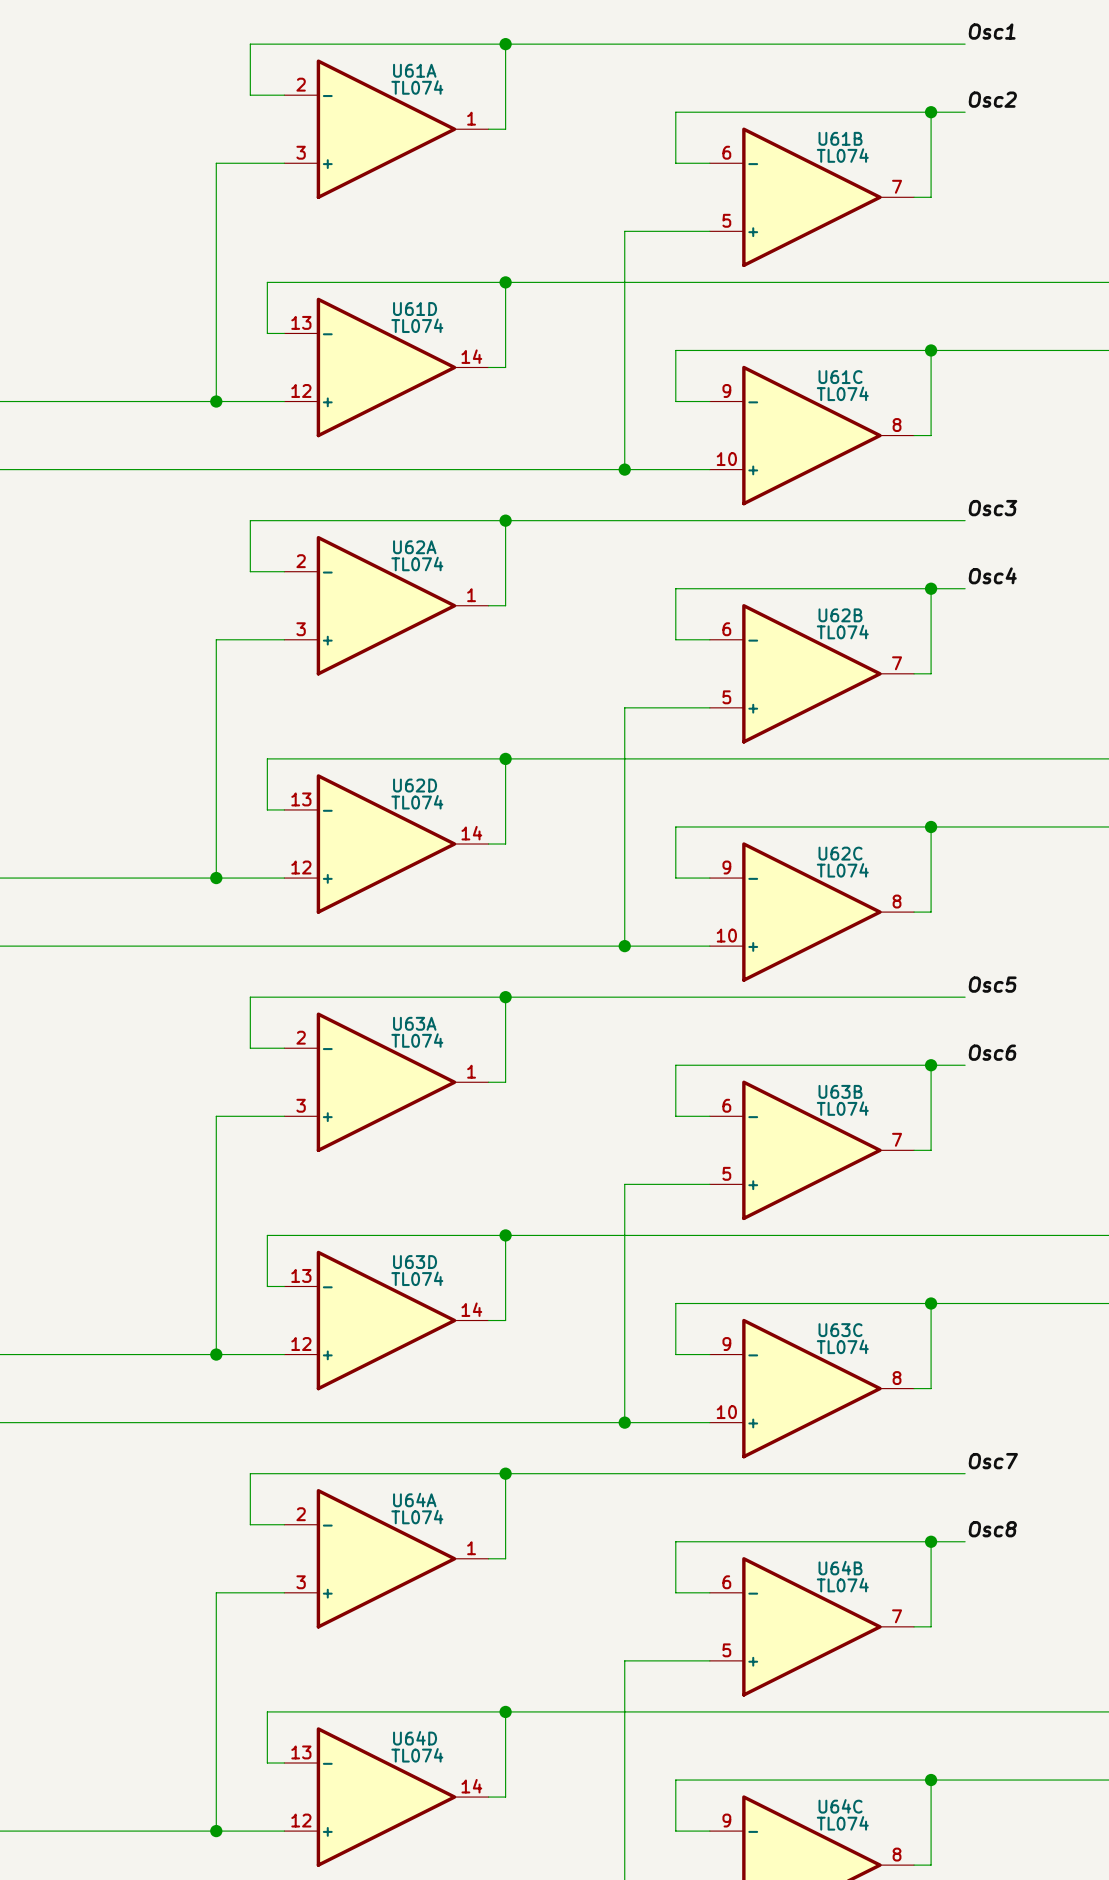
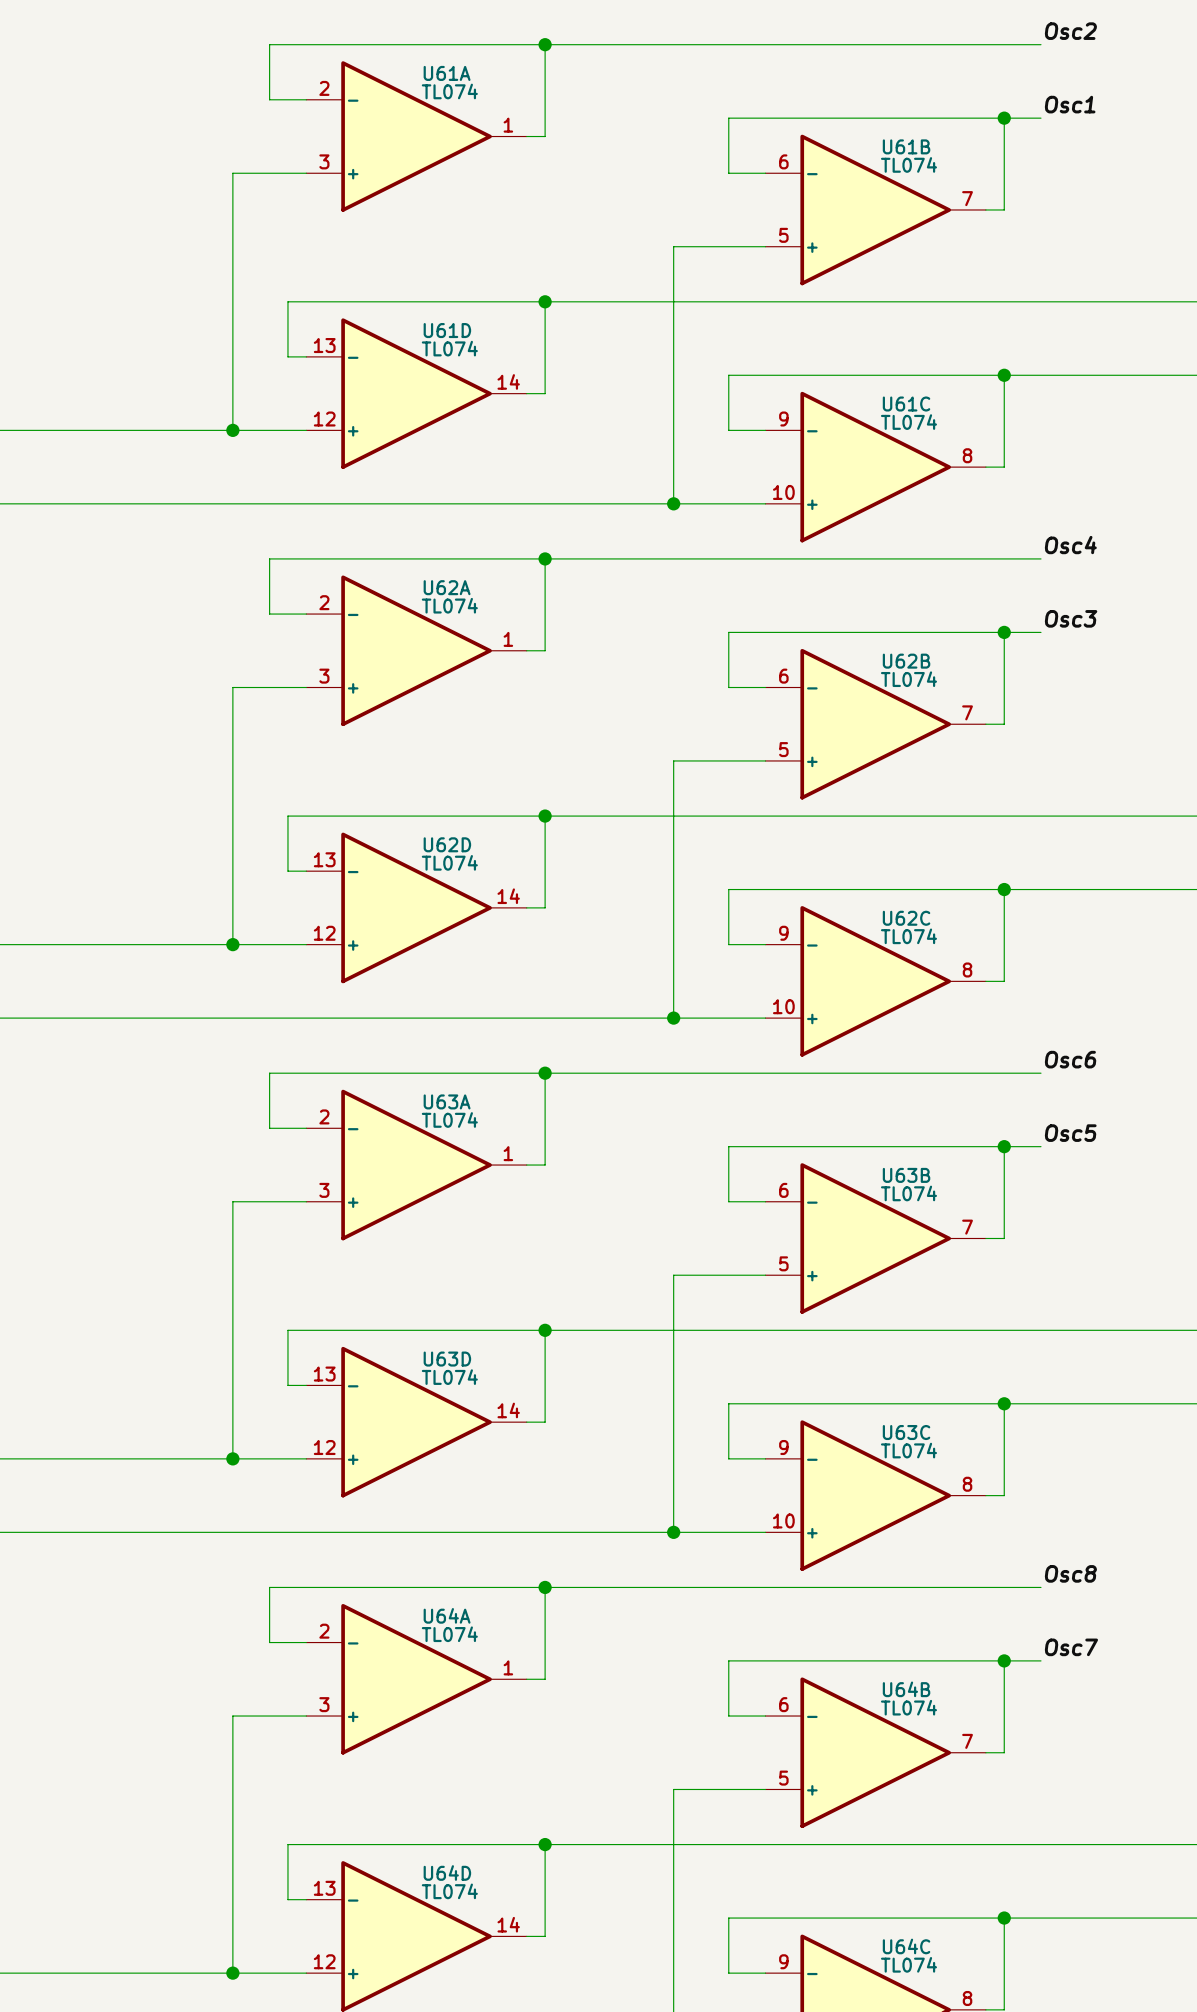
label: Osc1 (992, 31) -> Osc2 (1070, 31)
label: Osc2 (992, 99) -> Osc1 (1070, 104)
label: Osc3 (992, 508) -> Osc4 (1070, 545)
label: Osc4 (992, 575) -> Osc3 (1071, 618)
label: Osc5 (992, 984) -> Osc6 (1070, 1059)
label: Osc6 (992, 1052) -> Osc5 (1070, 1133)
label: Osc7 (993, 1461) -> Osc8 (1070, 1573)
label: Osc8 (992, 1529) -> Osc7 (1071, 1647)

